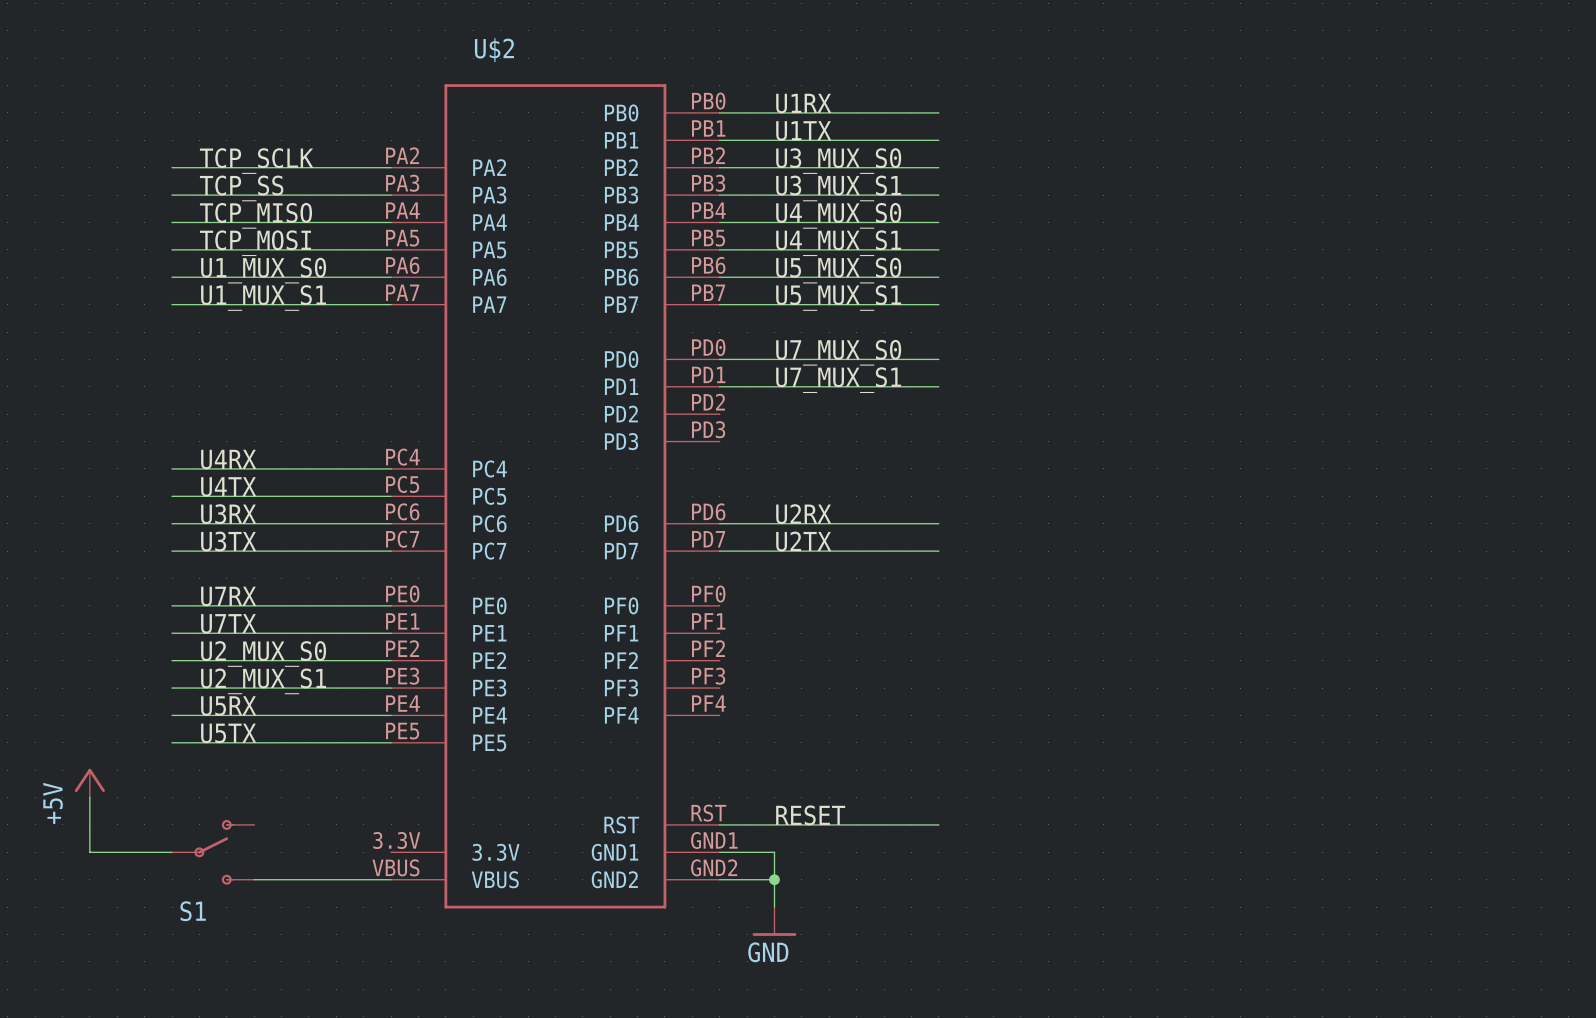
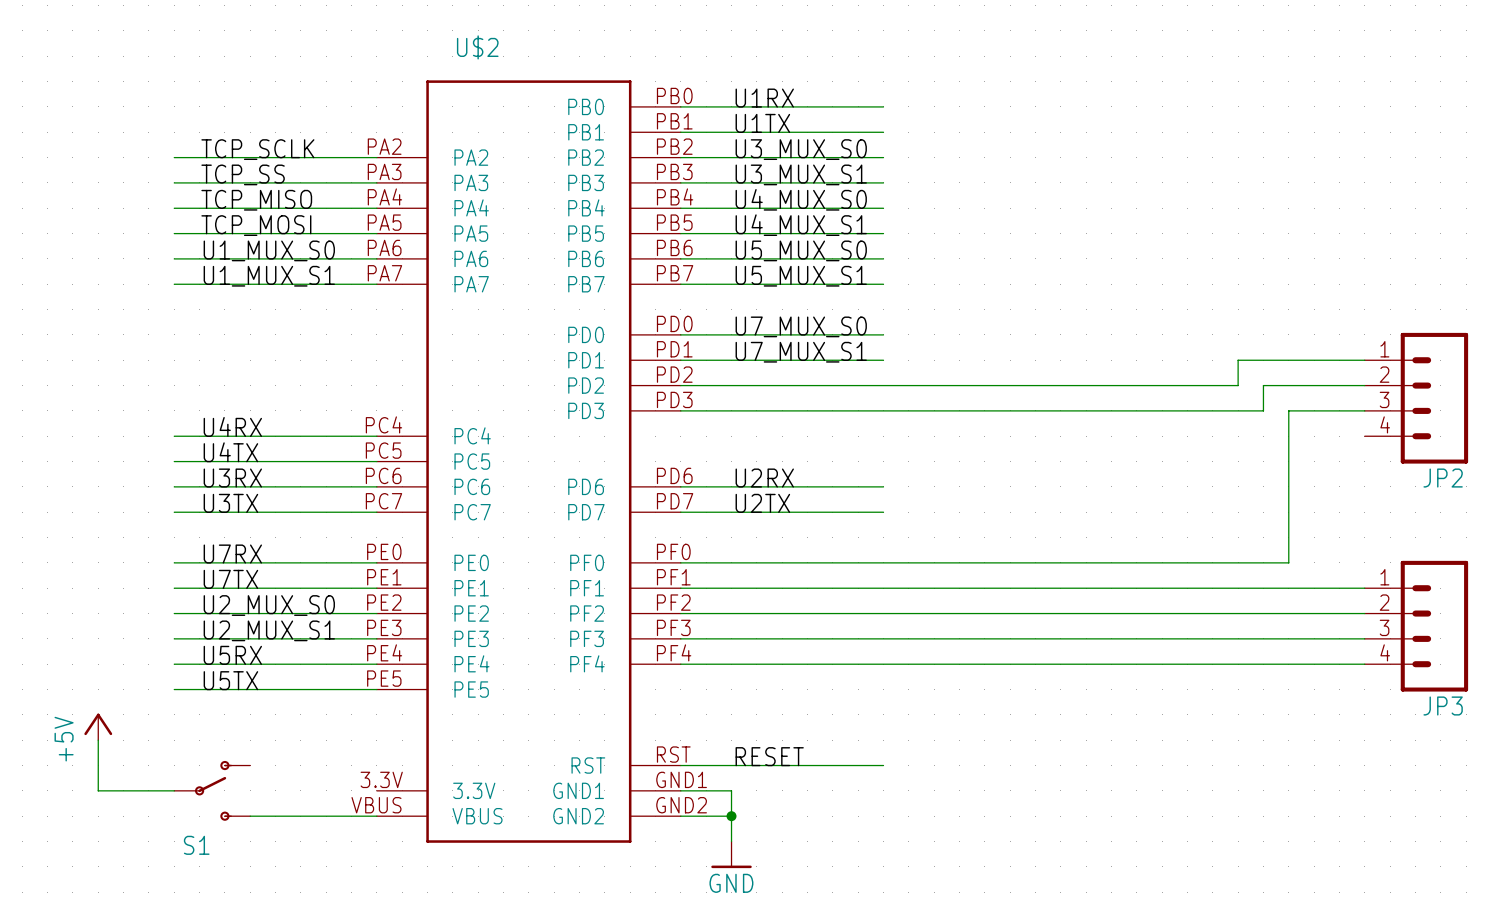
wire: none -> (1364, 360) (1238, 360) (1238, 385) (680, 385)
wire: none -> (1364, 385) (1263, 385) (1263, 410) (680, 410)
JP2: none -> (1416, 398)
wire: none -> (1364, 410) (1288, 410) (1288, 562) (680, 562)
wire: none -> (680, 588) (1364, 588)
wire: none -> (680, 613) (1364, 613)
JP3: none -> (1416, 626)
wire: none -> (680, 638) (1364, 638)
wire: none -> (680, 664) (1364, 664)

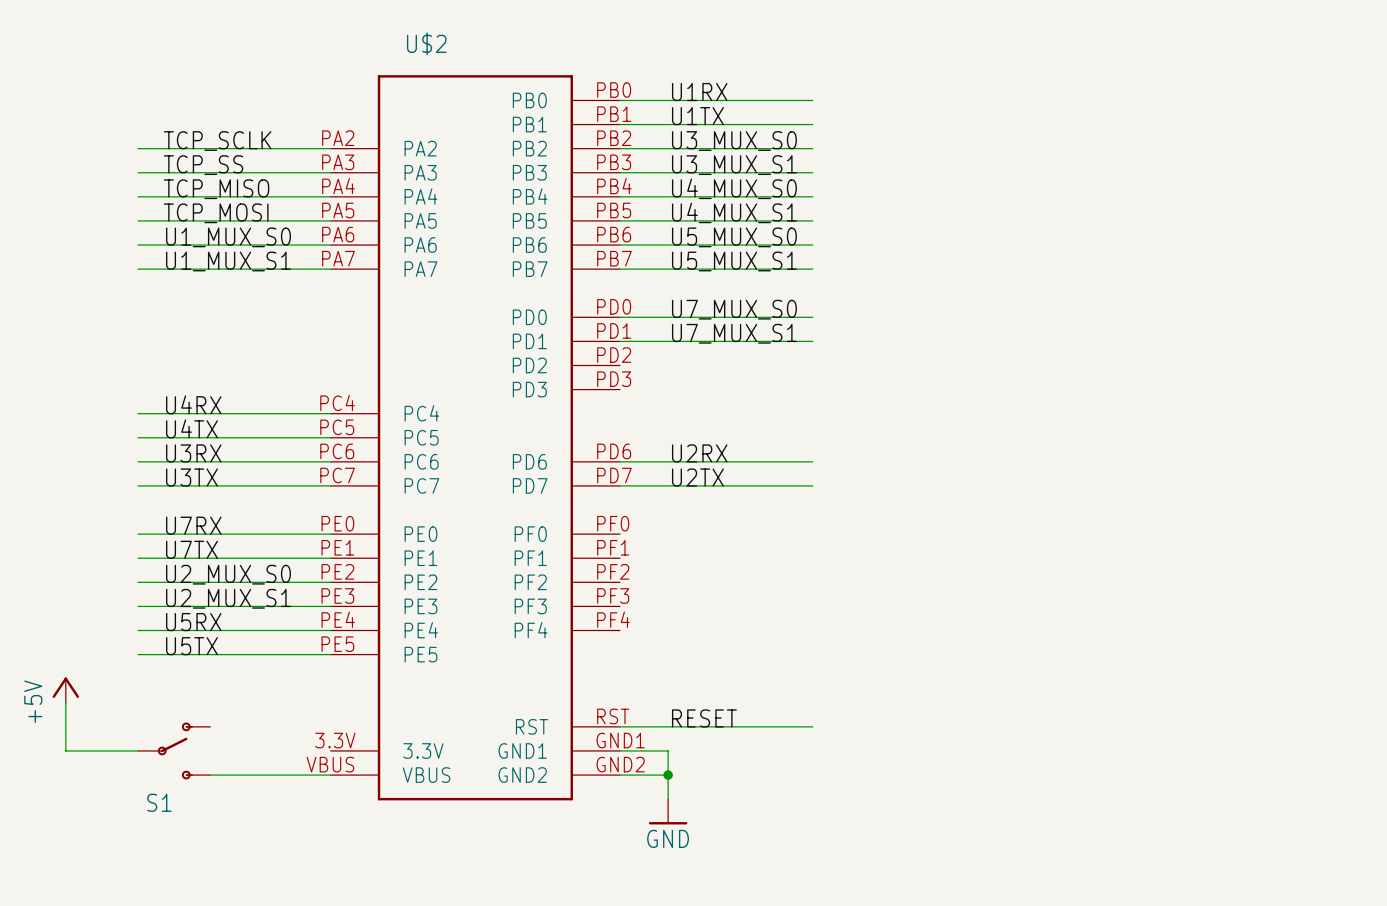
wire: (1364, 360) (1238, 360) (1238, 385) (680, 385) -> none
wire: (1364, 385) (1263, 385) (1263, 410) (680, 410) -> none
JP2: (1416, 398) -> none
wire: (1364, 410) (1288, 410) (1288, 562) (680, 562) -> none
wire: (680, 588) (1364, 588) -> none
wire: (680, 613) (1364, 613) -> none
JP3: (1416, 626) -> none
wire: (680, 638) (1364, 638) -> none
wire: (680, 664) (1364, 664) -> none

